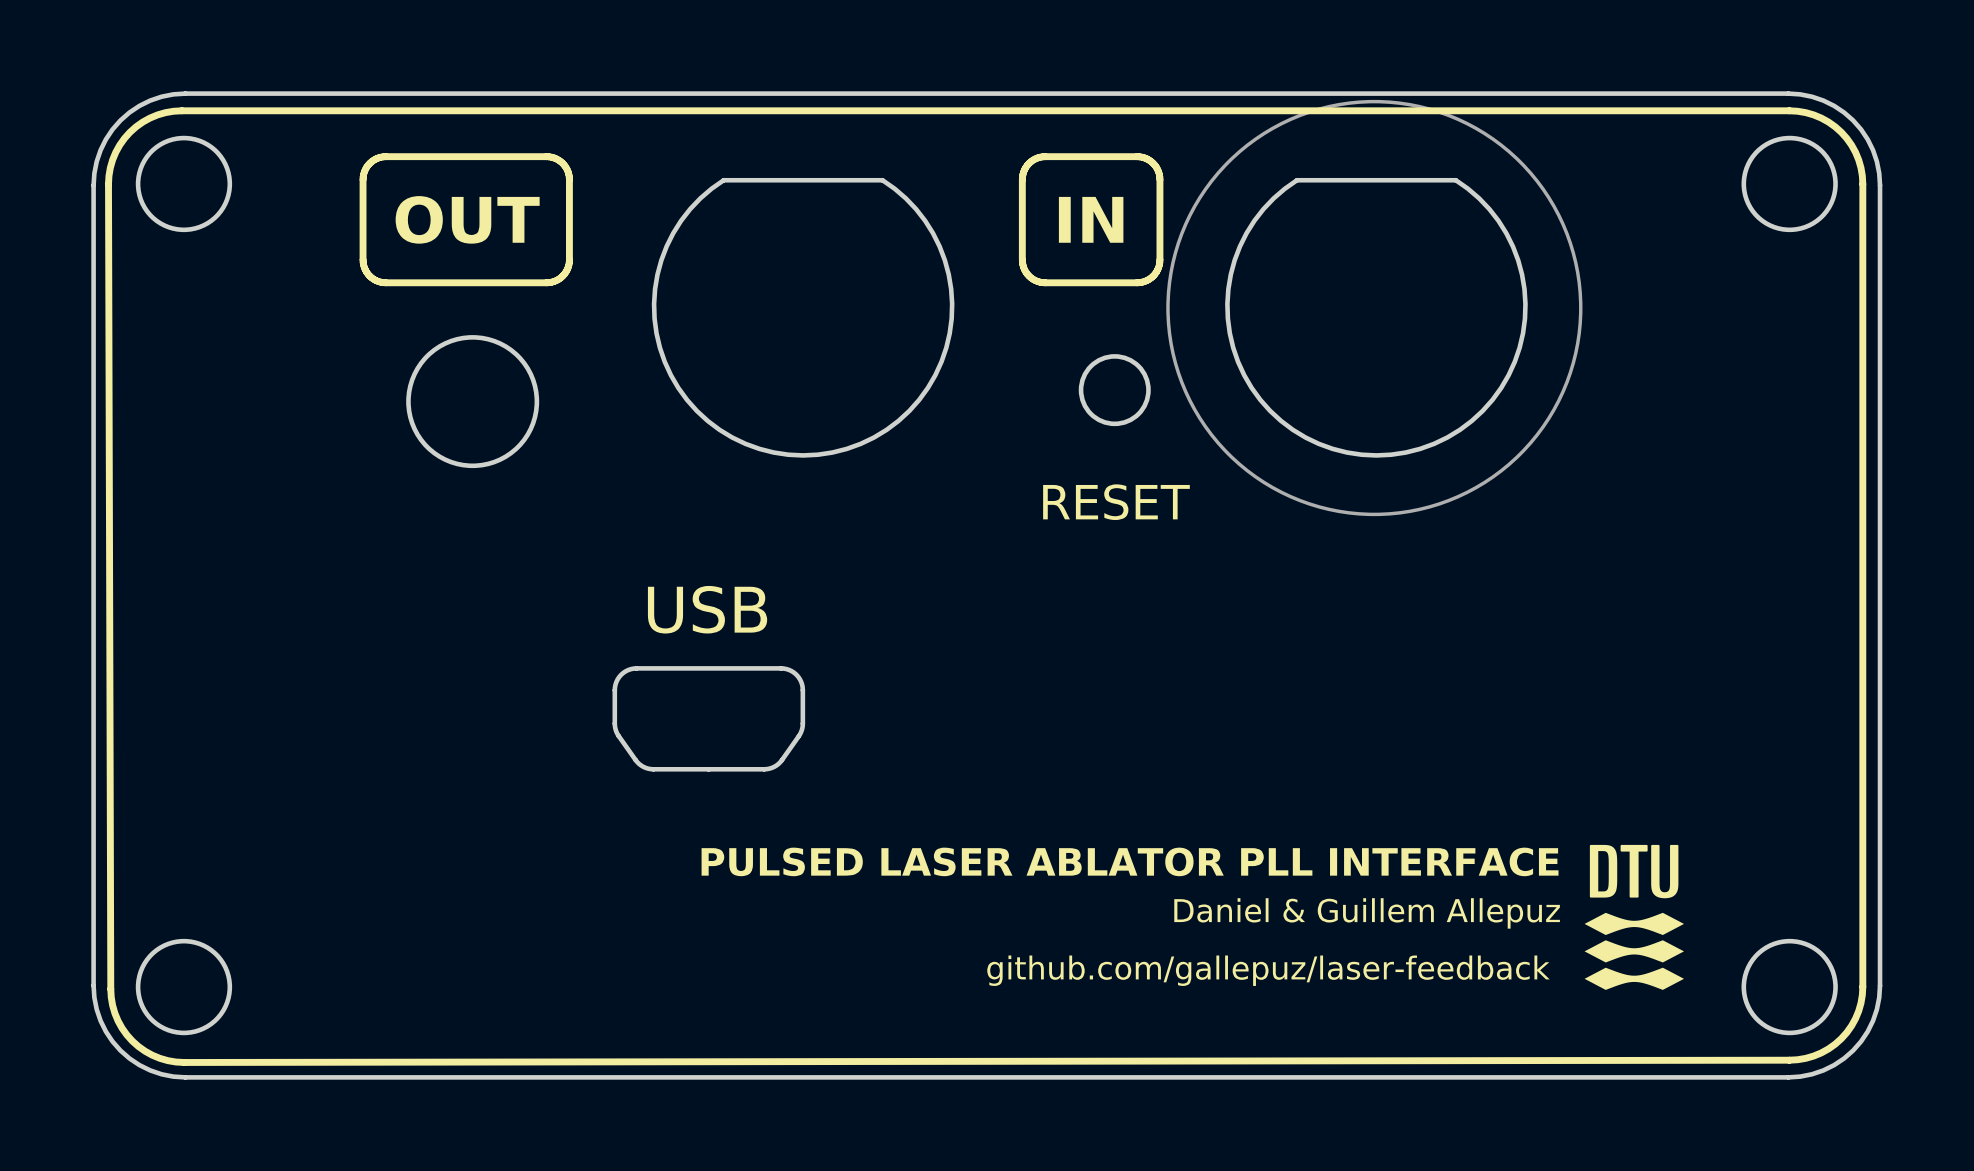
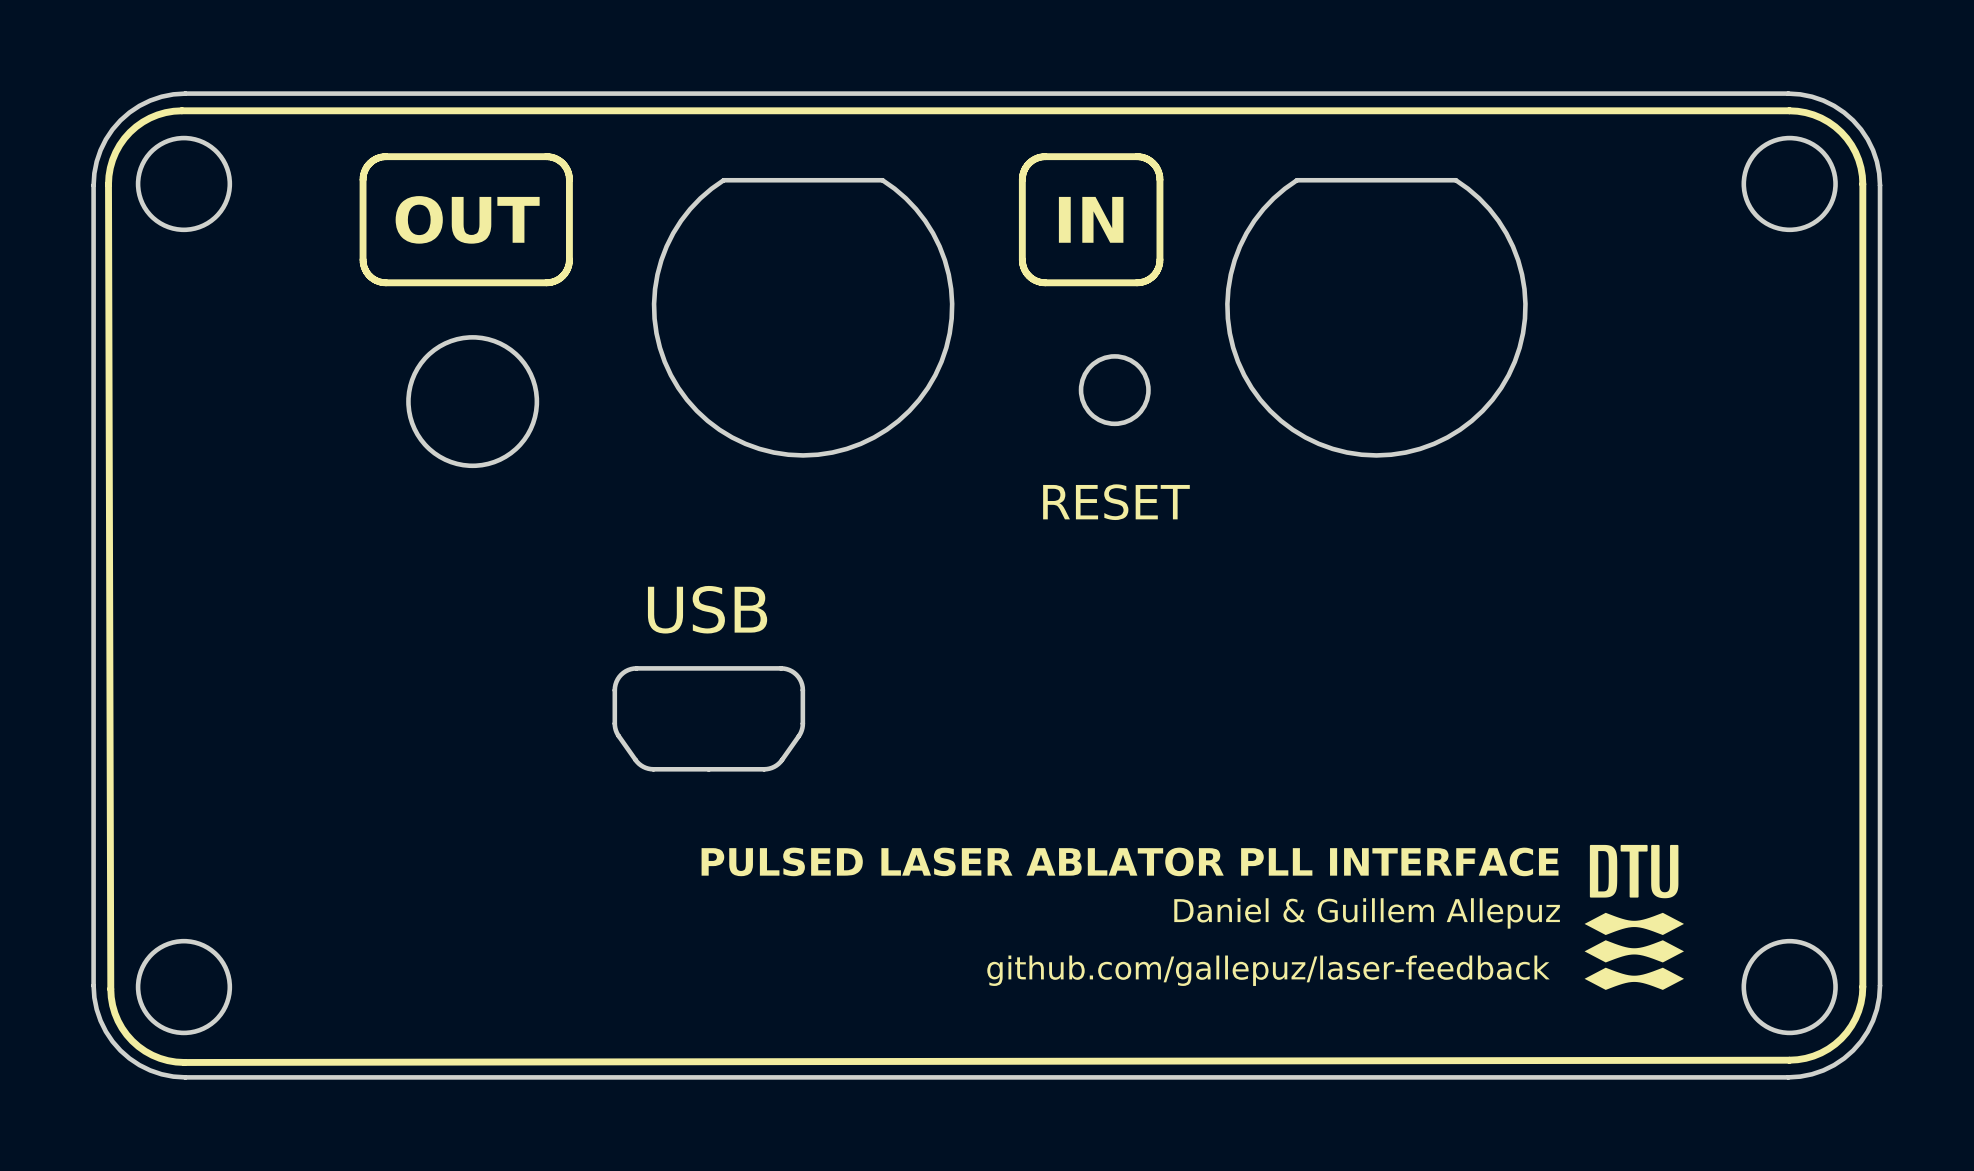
drawing: [1166, 99, 1583, 517] -> none

